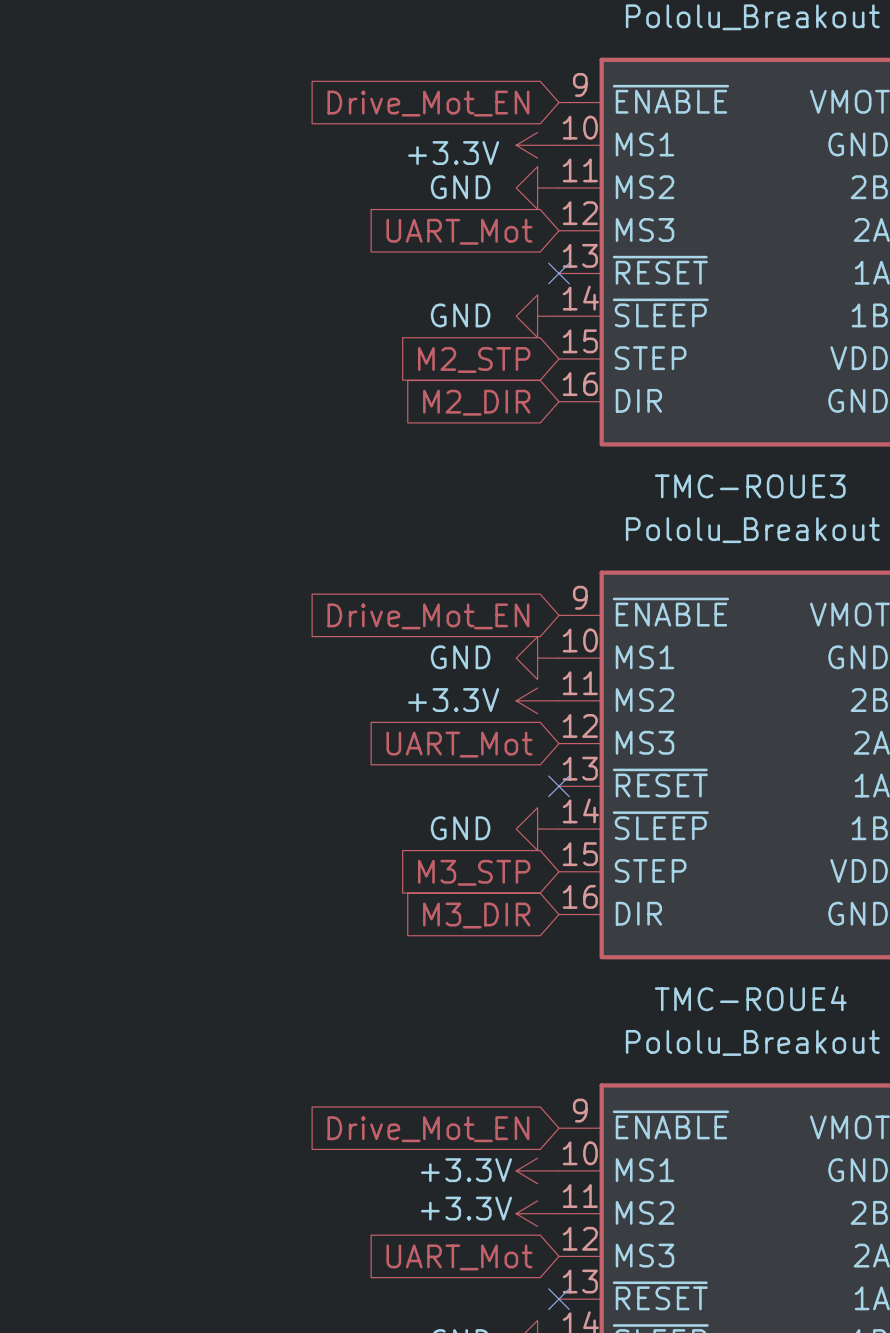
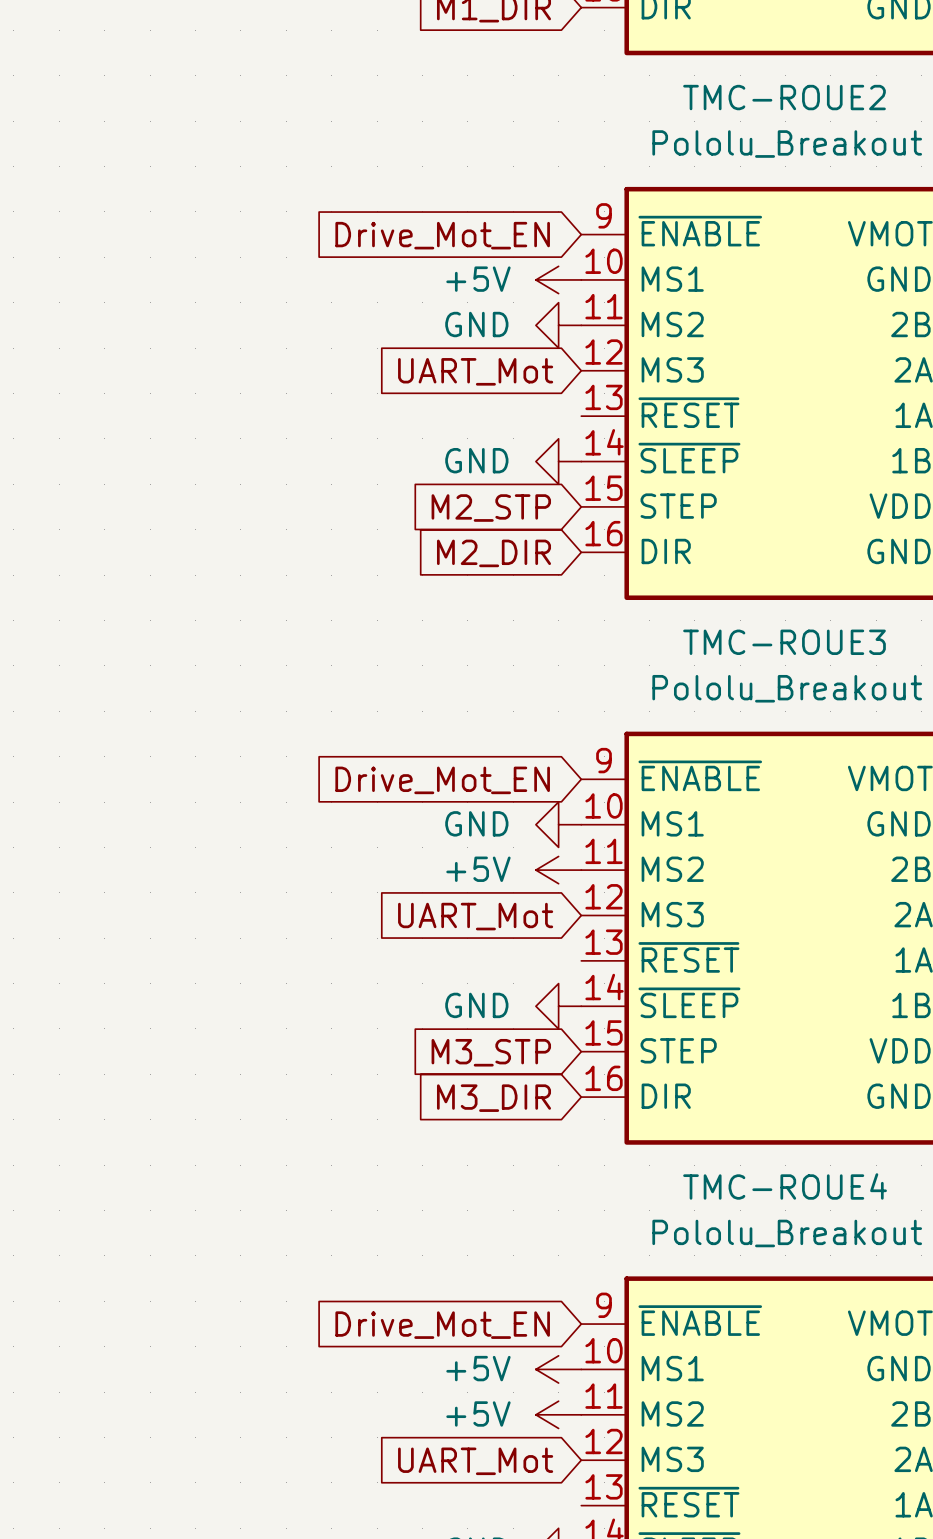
power symbol: +3.3V (537, 145) -> +5V (558, 279)
no-connect mark: (558, 273) -> none
power symbol: +3.3V (537, 700) -> +5V (558, 870)
no-connect mark: (558, 786) -> none
power symbol: +3.3V (537, 1170) -> +5V (558, 1369)
power symbol: +3.3V (537, 1213) -> +5V (558, 1414)
no-connect mark: (558, 1299) -> none

